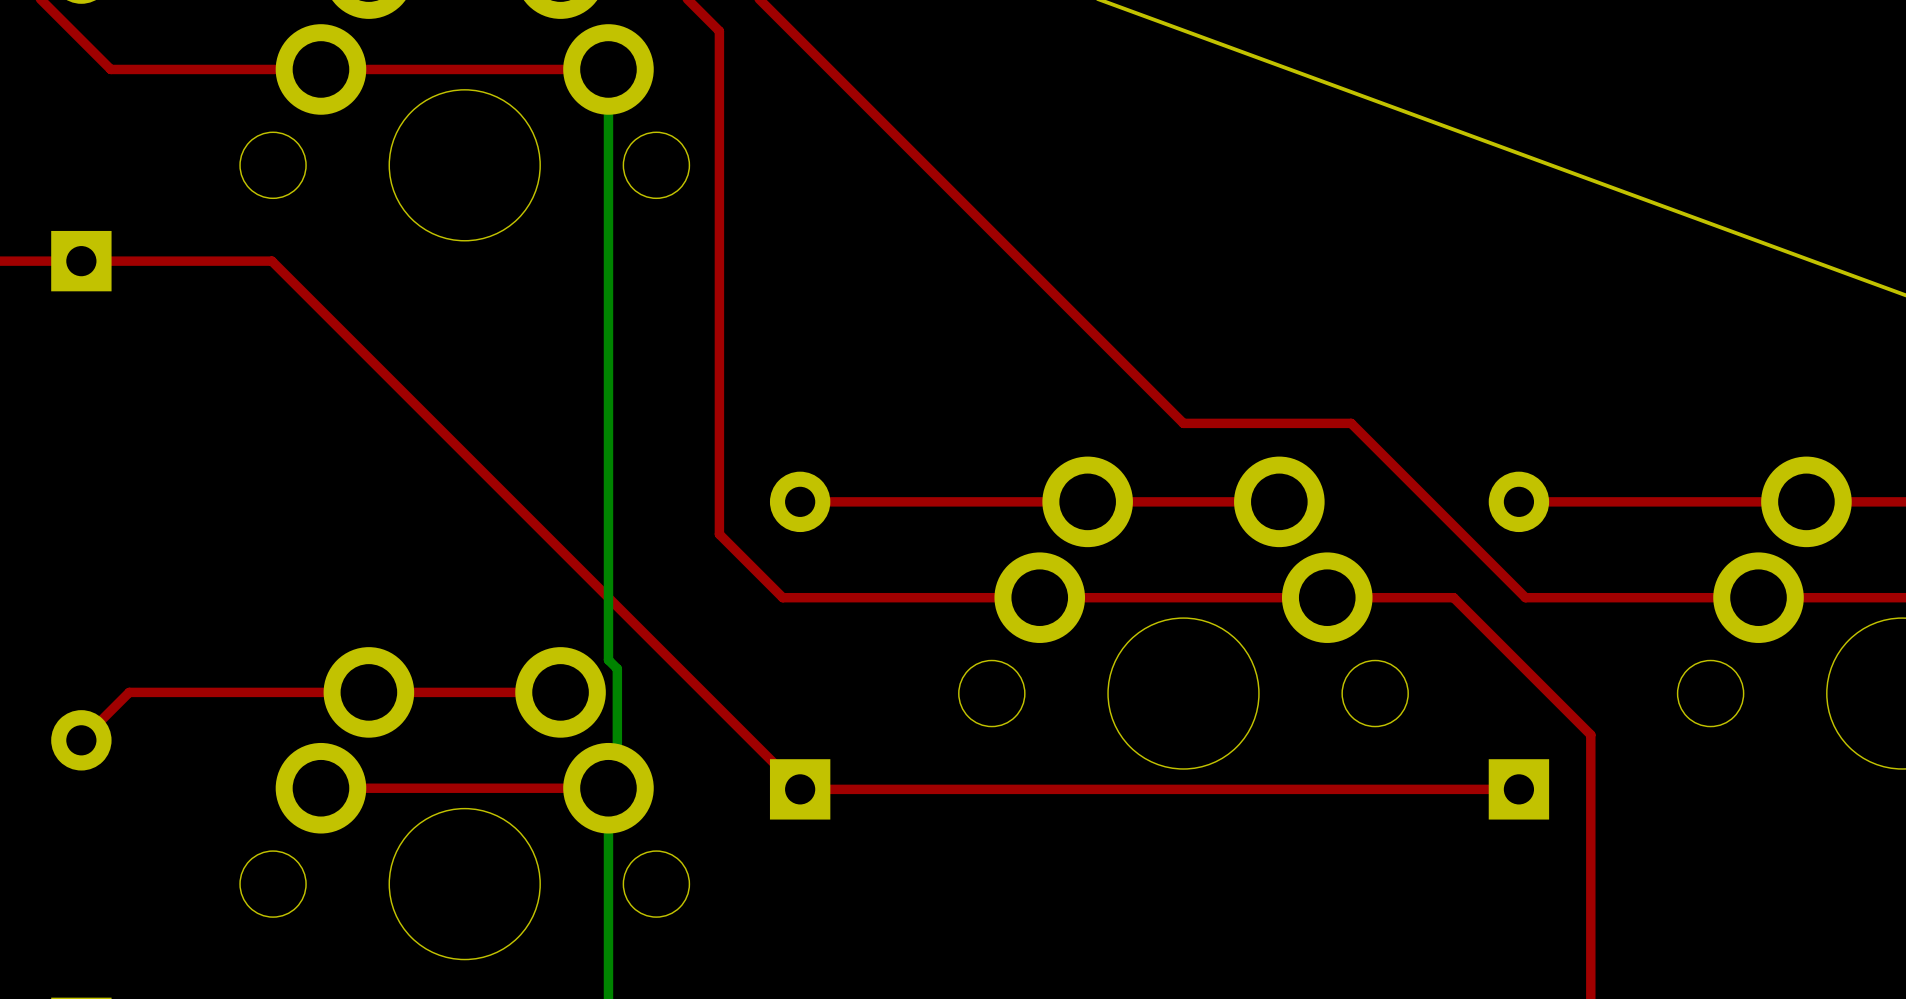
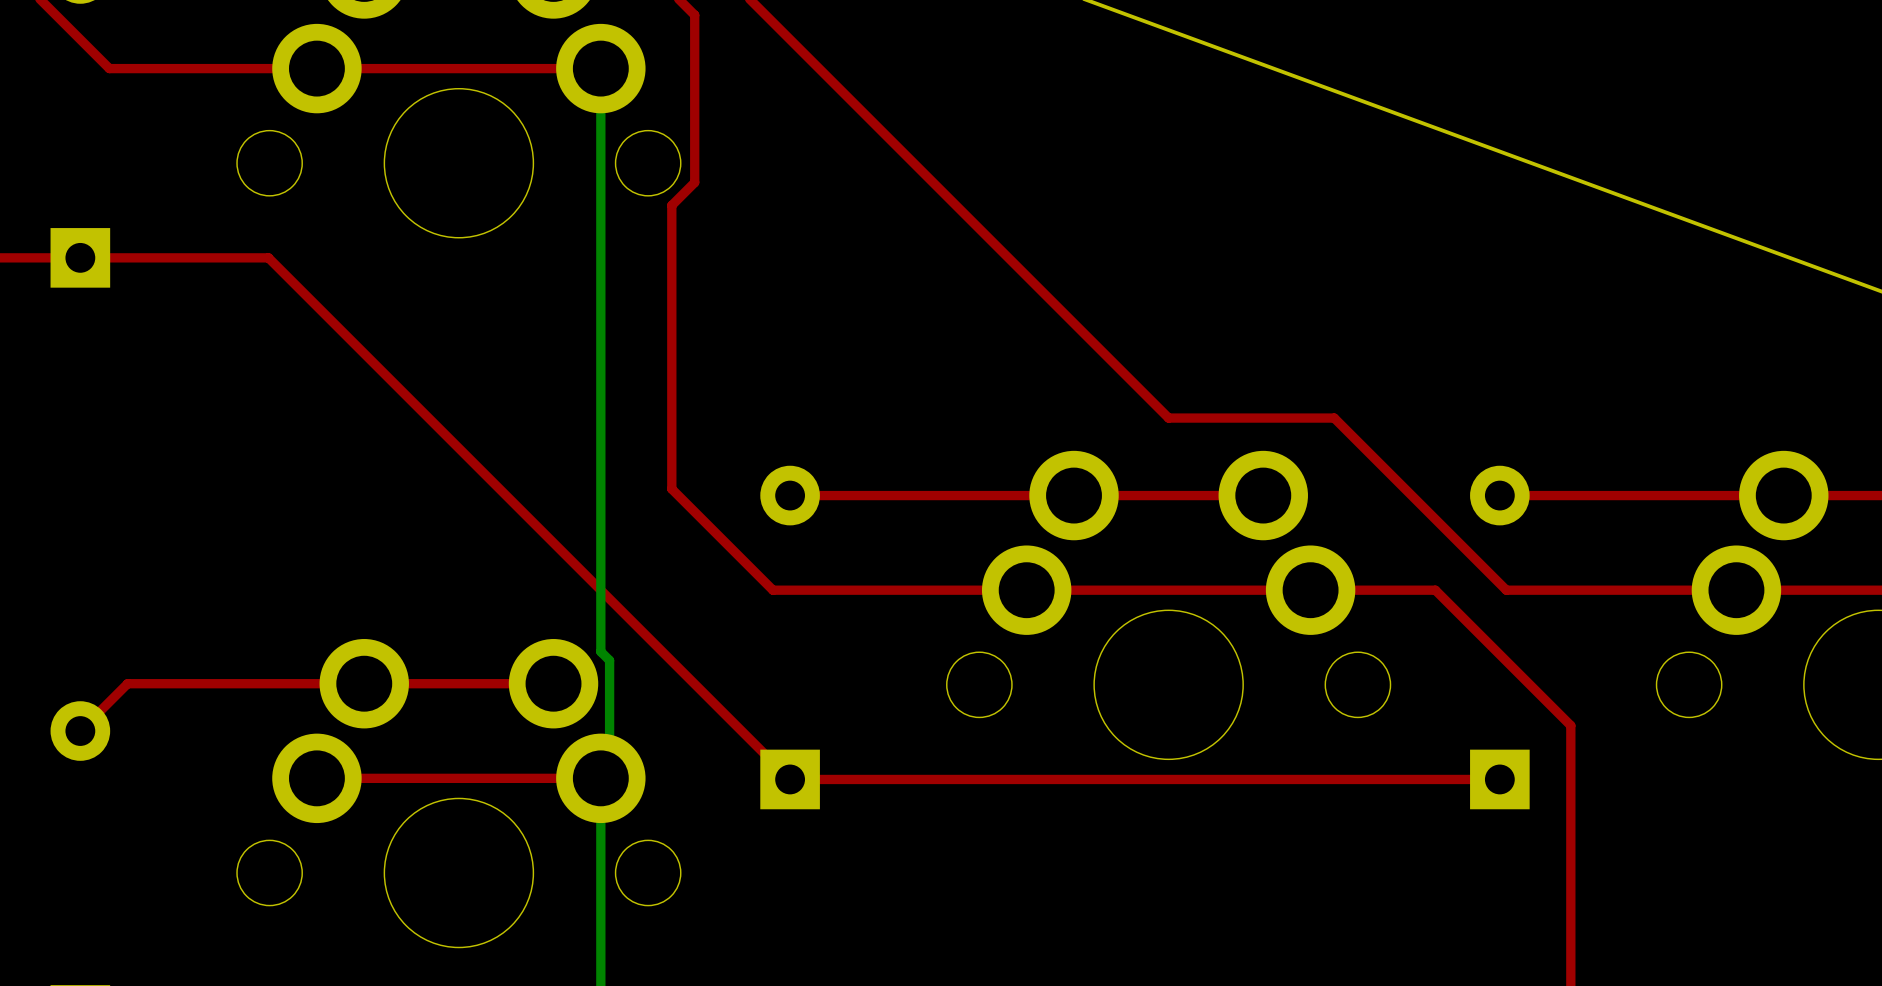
top track: (703, 15) (719, 31) (719, 534) -> (694, 15) (694, 182) (671, 205) (671, 489) (710, 527)

